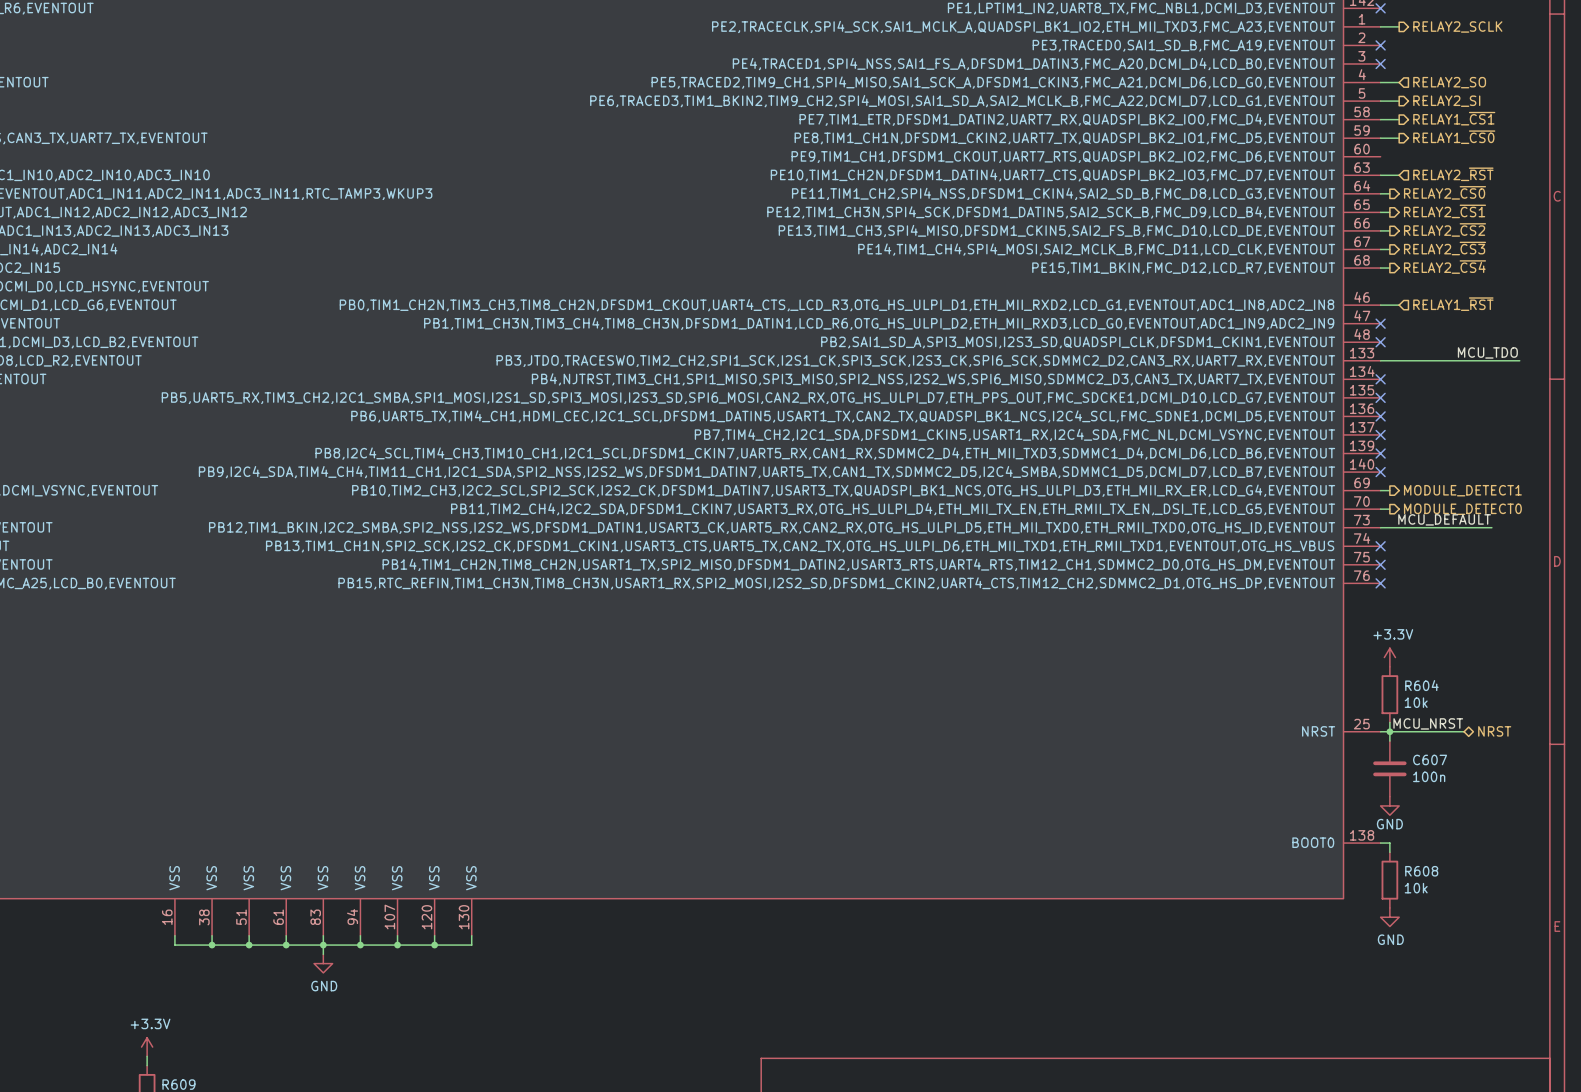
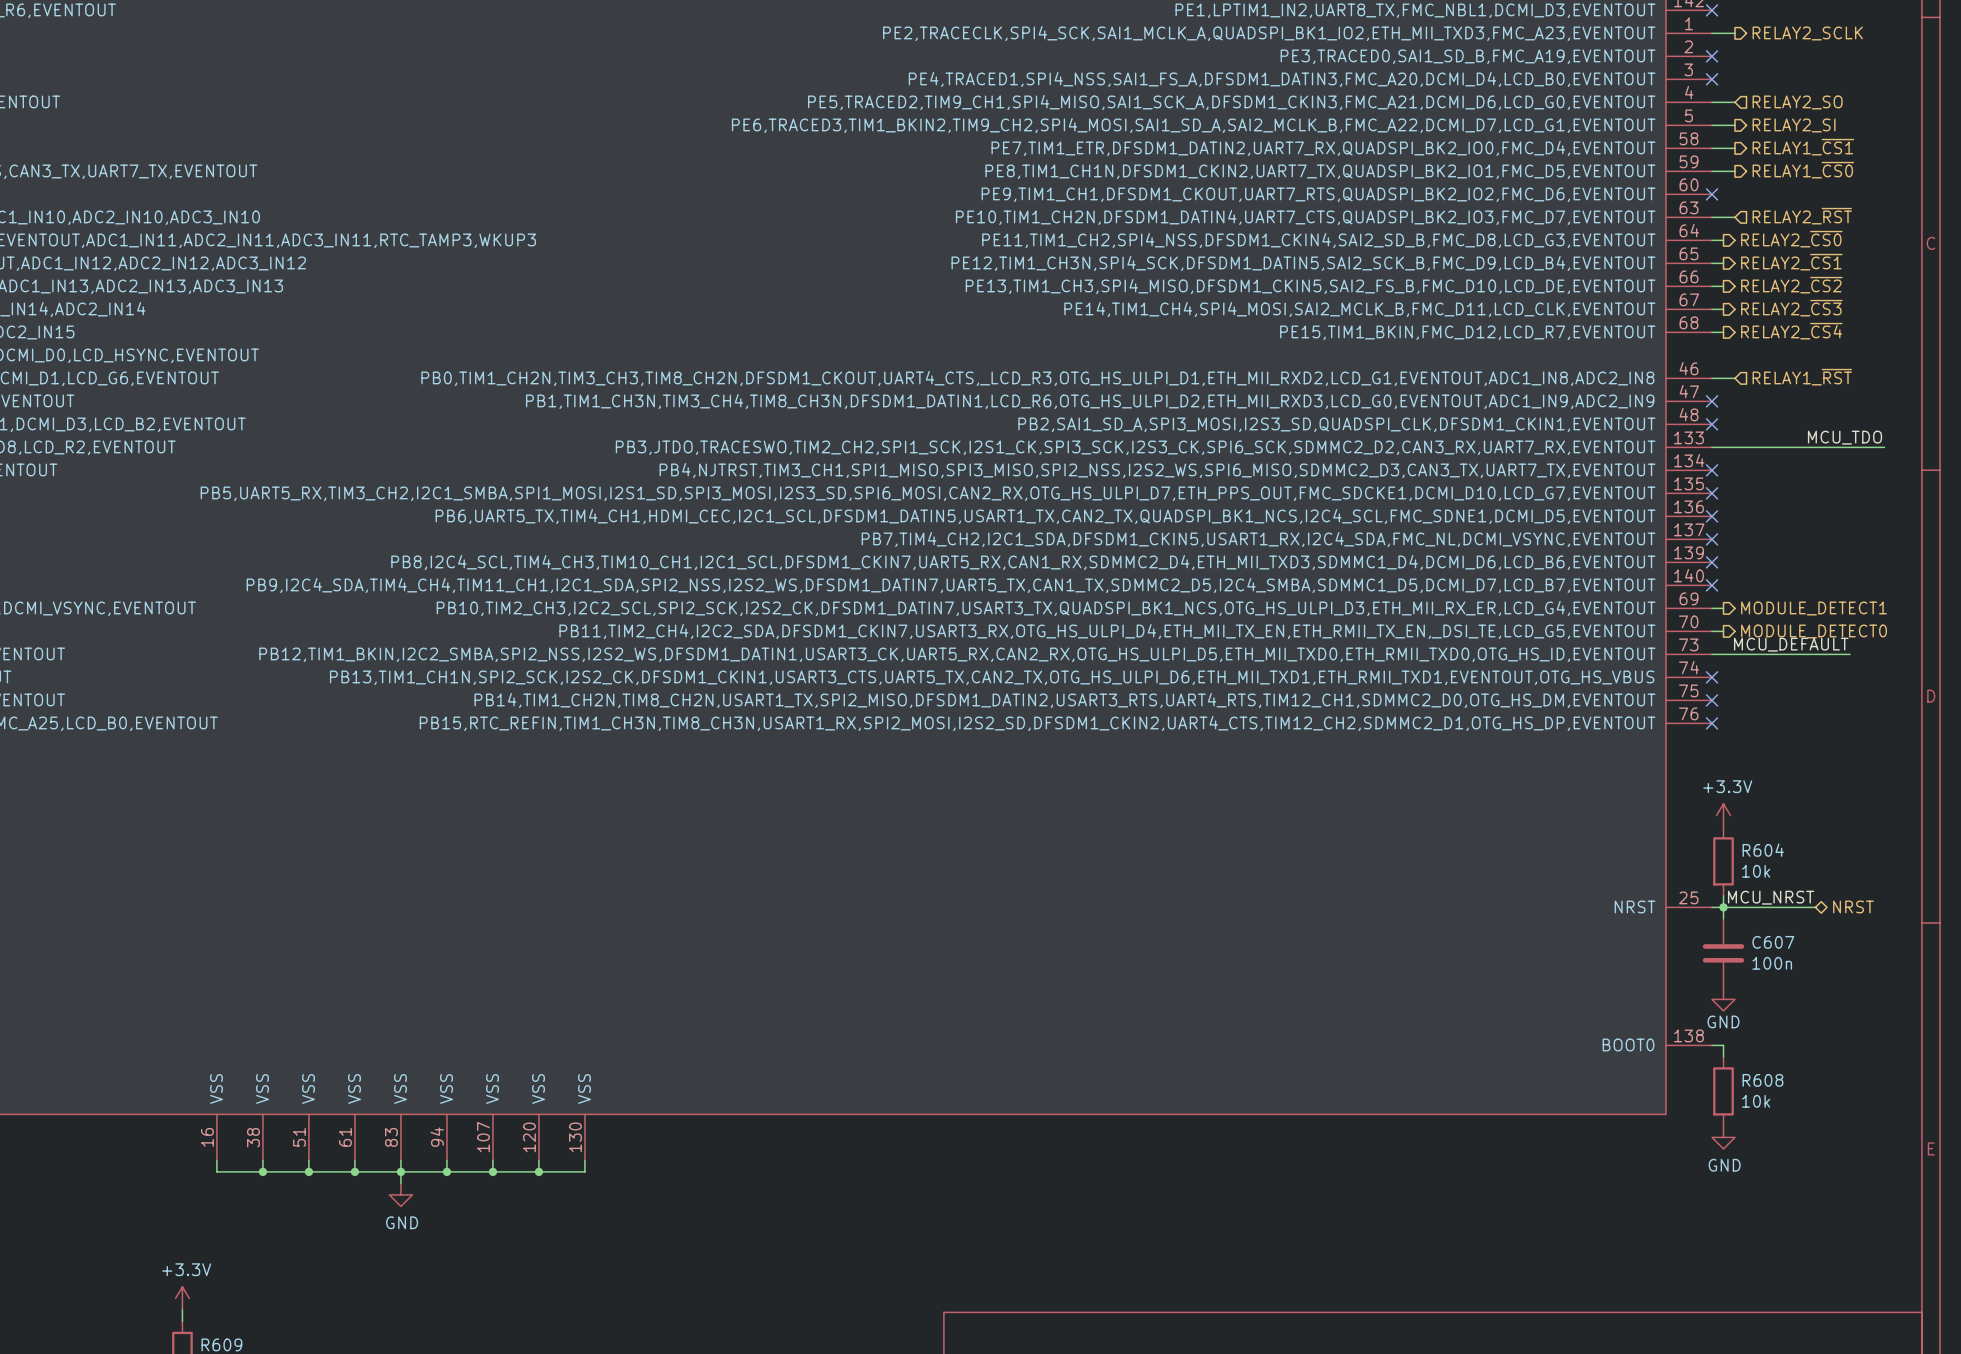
no-connect mark: none -> (1712, 194)

